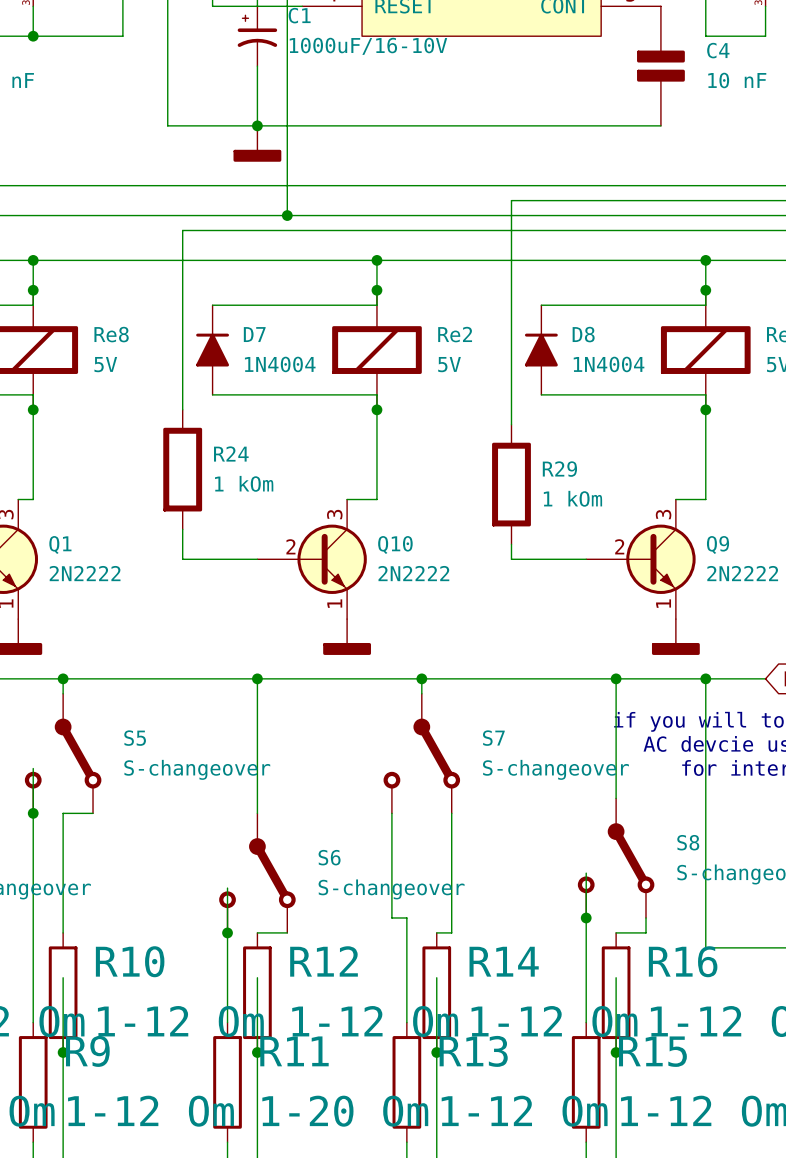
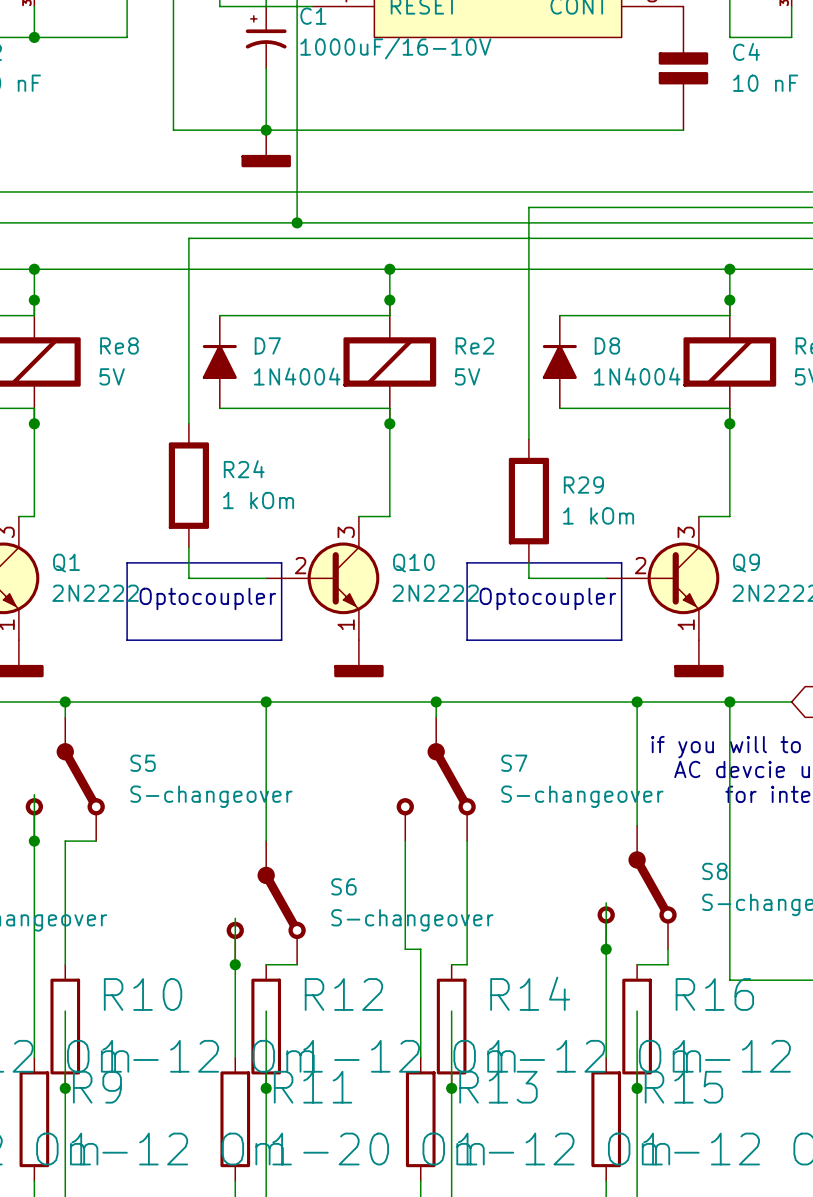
line: none -> (127, 562) (281, 562) (281, 640) (127, 640) (127, 562)
line: none -> (467, 562) (621, 562) (621, 640) (467, 640) (467, 562)
text: none -> Optocoupler (207, 598)
text: none -> Optocoupler (547, 598)

